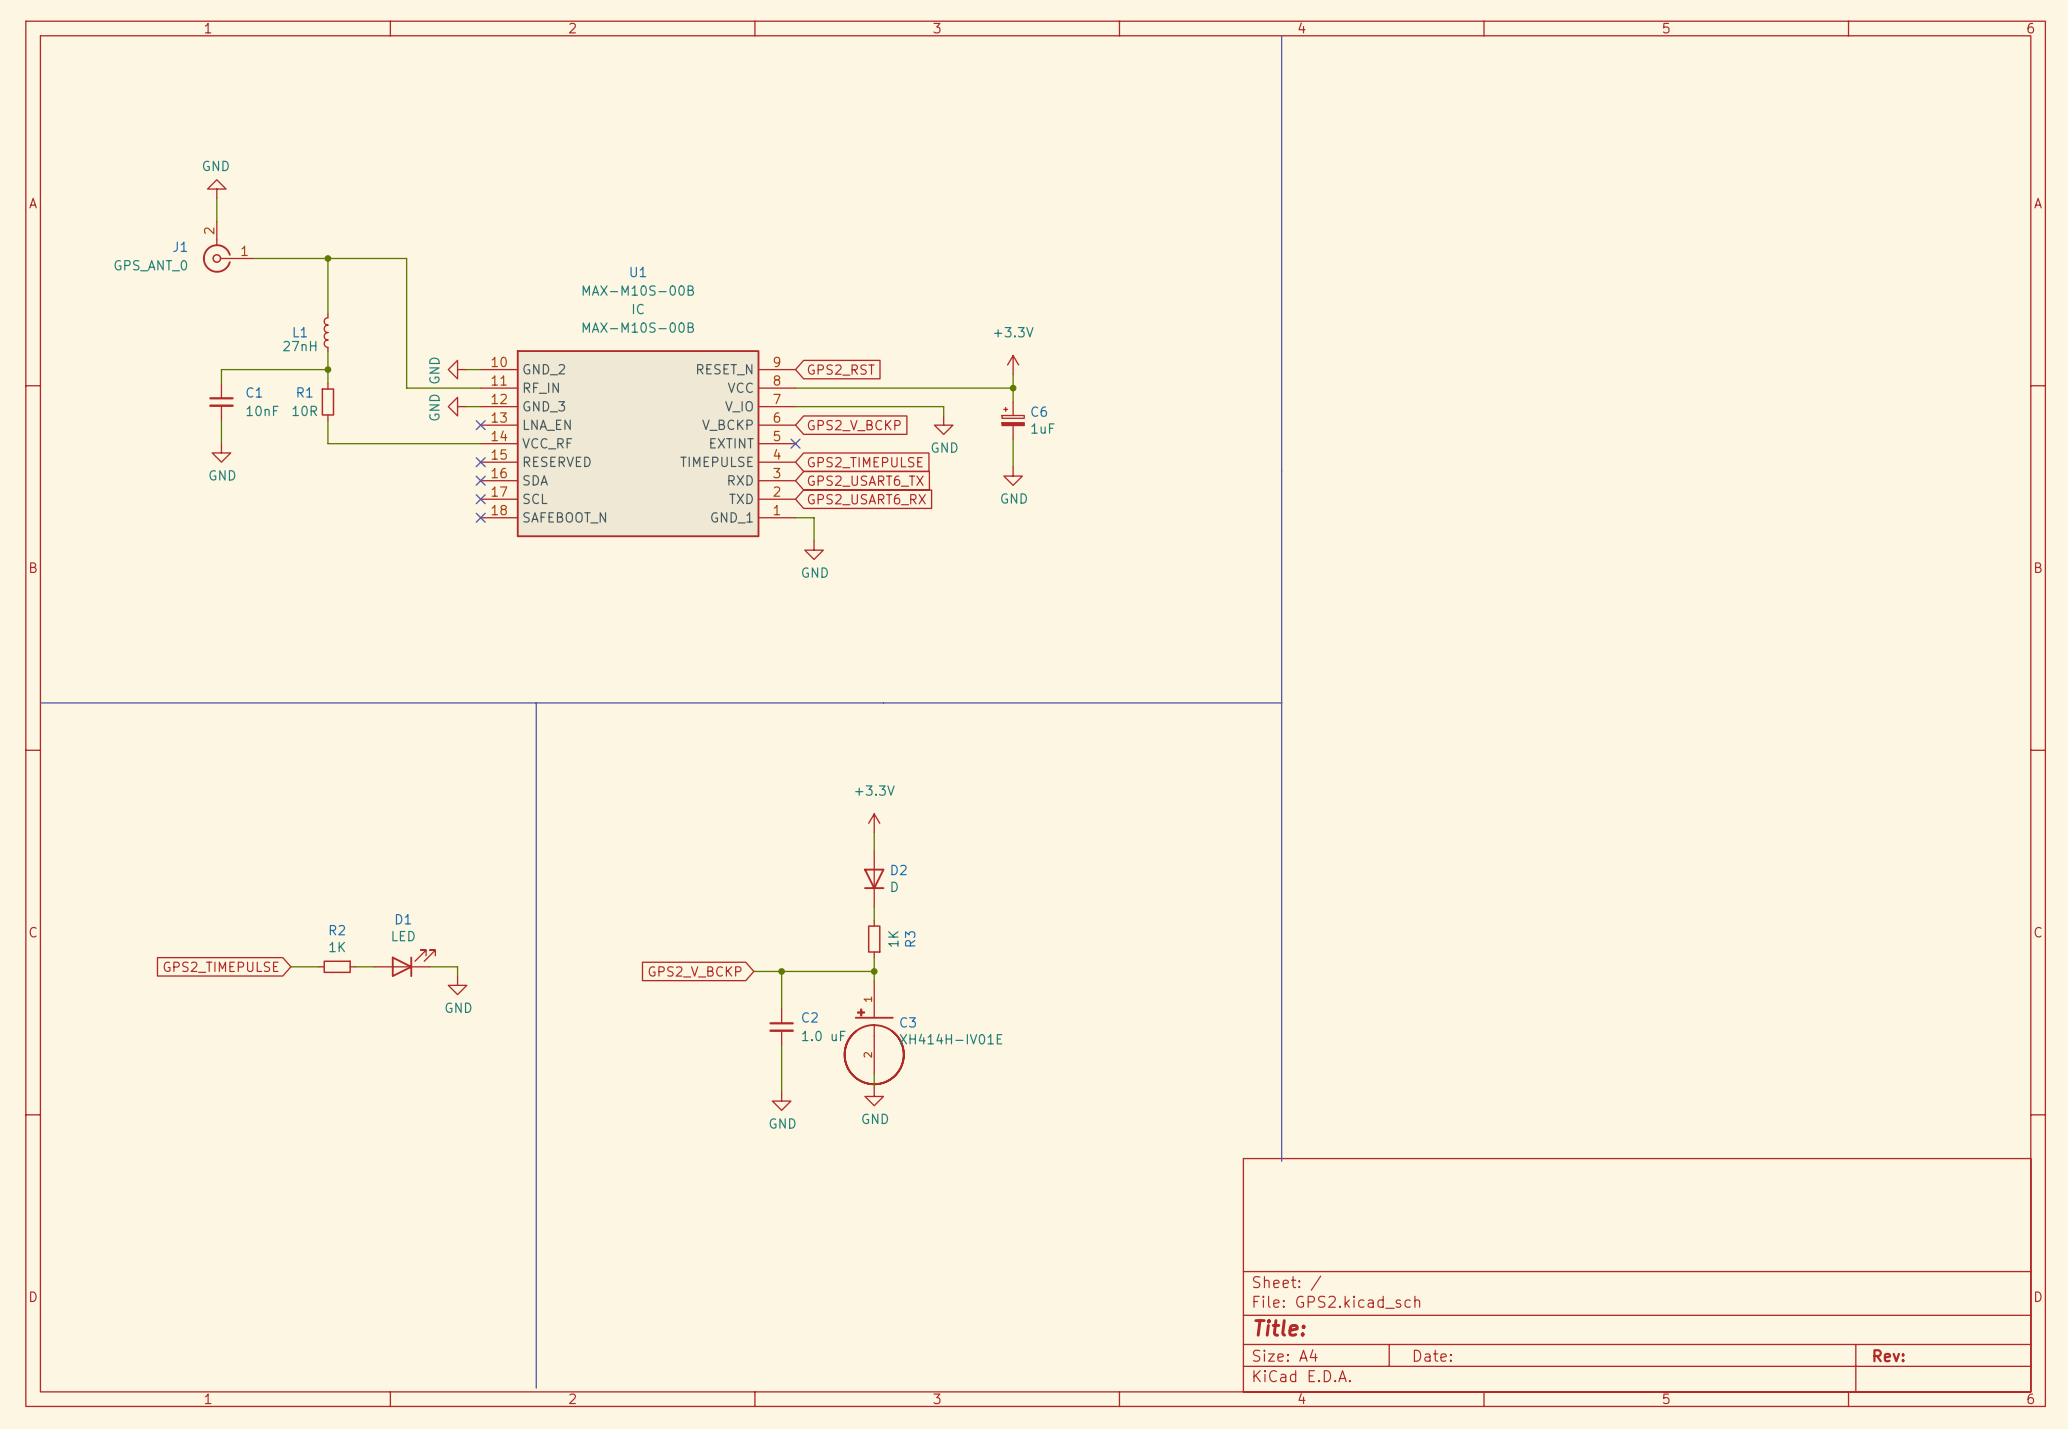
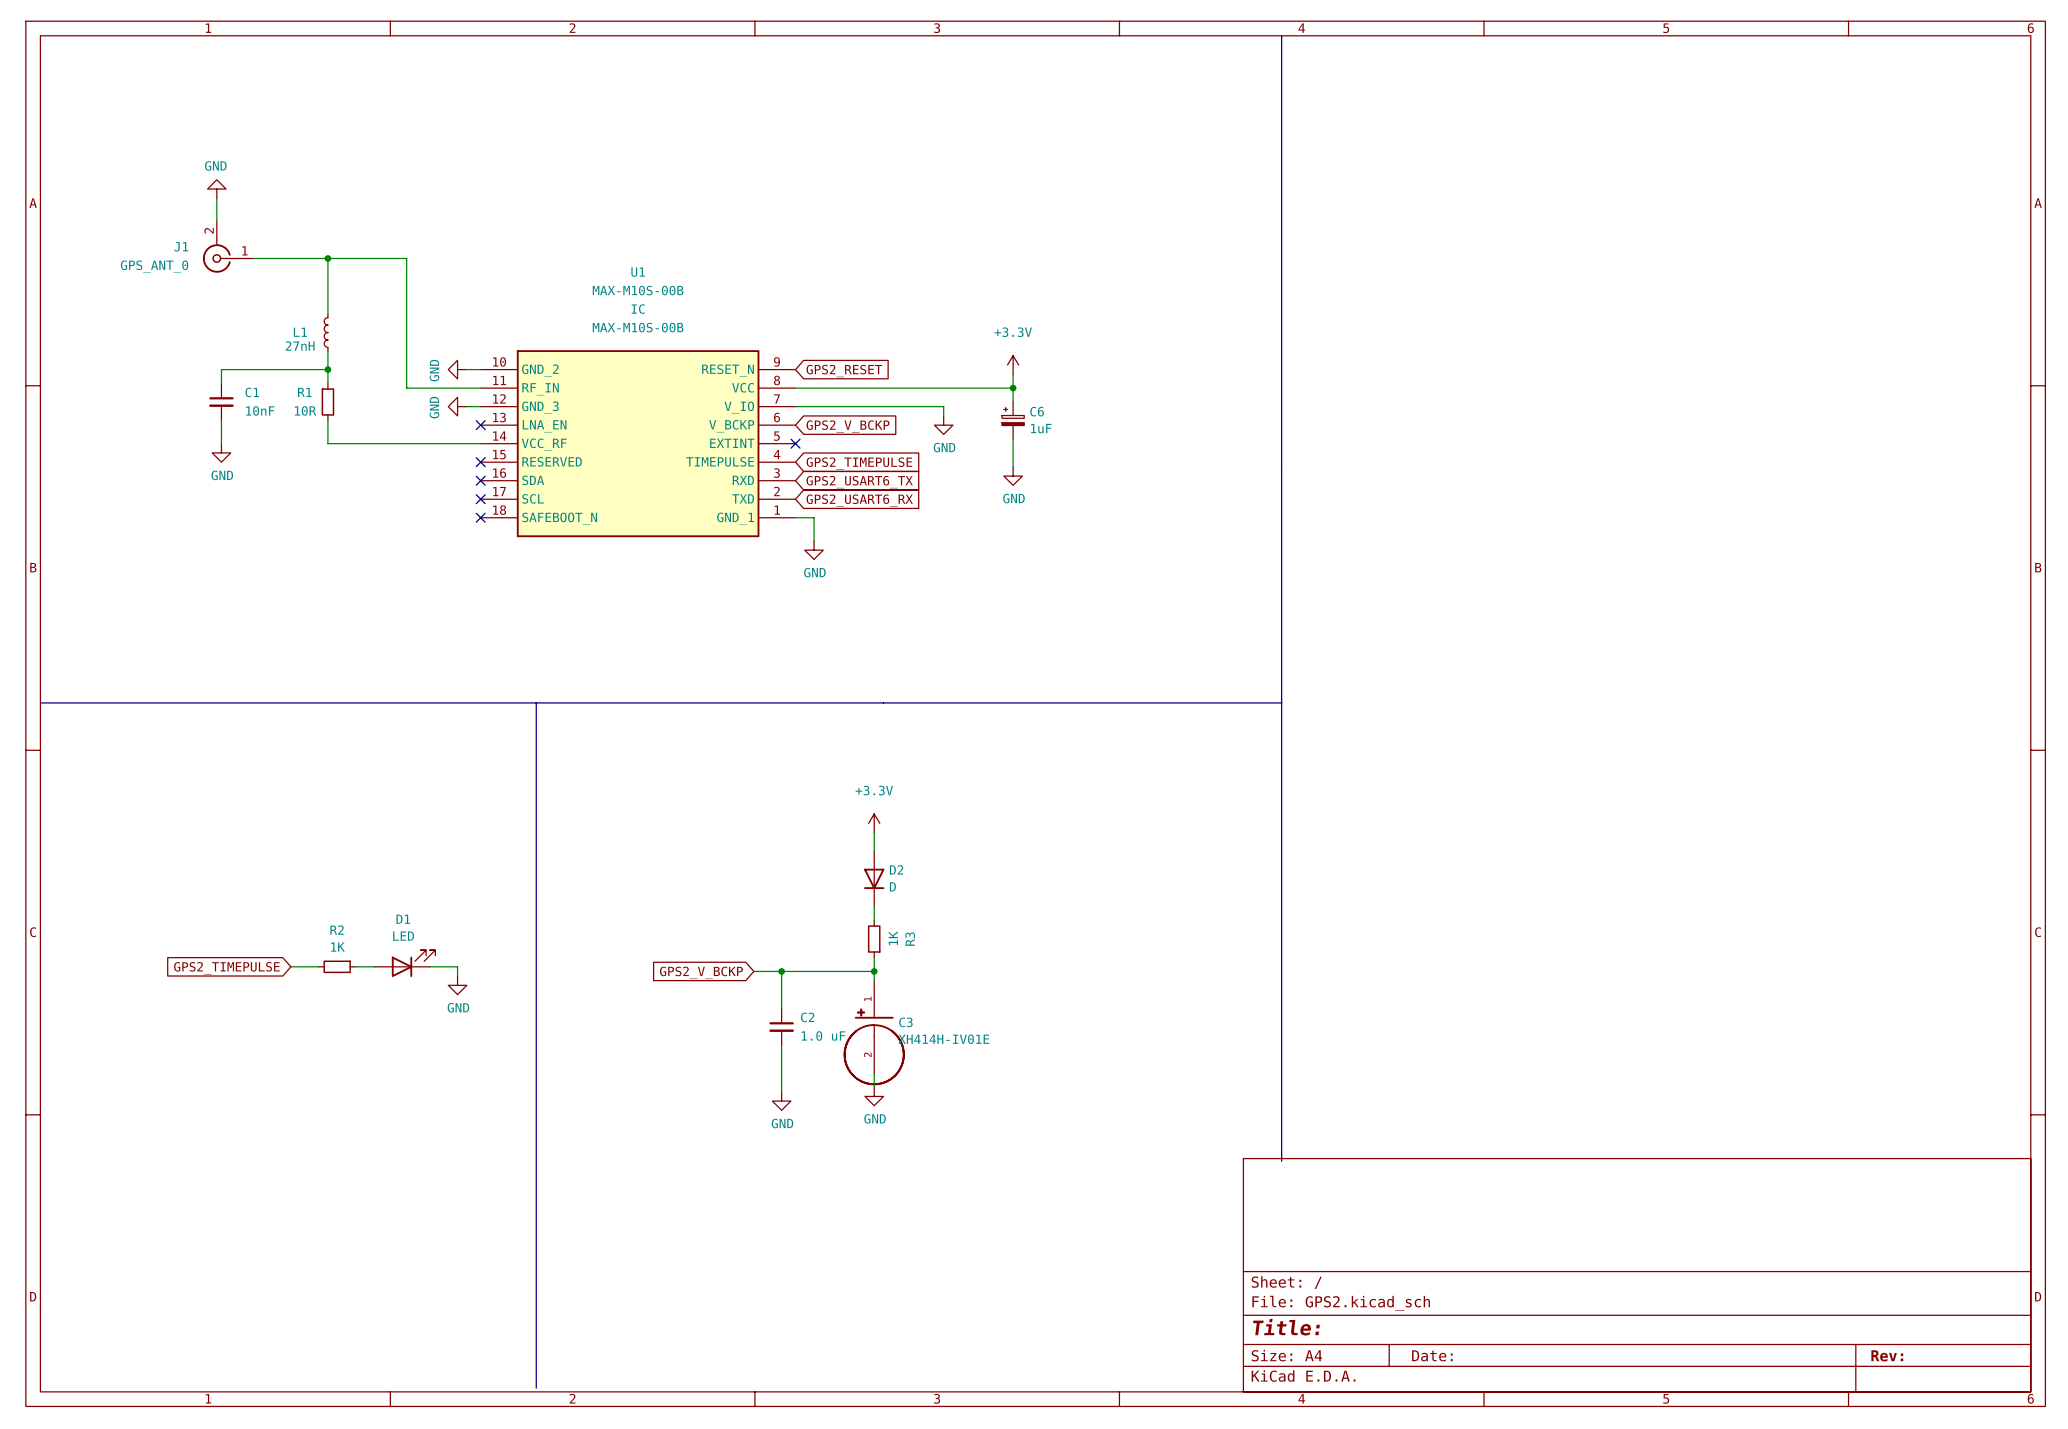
global label: GPS2_RST (841, 370) -> GPS2_RESET (844, 371)

